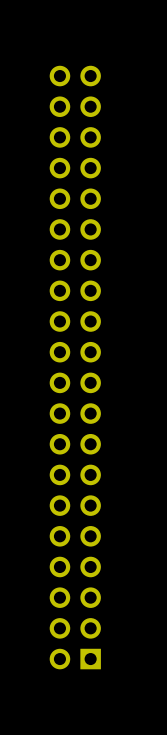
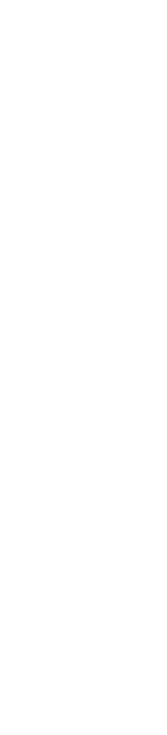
part: (75, 367) -> none

